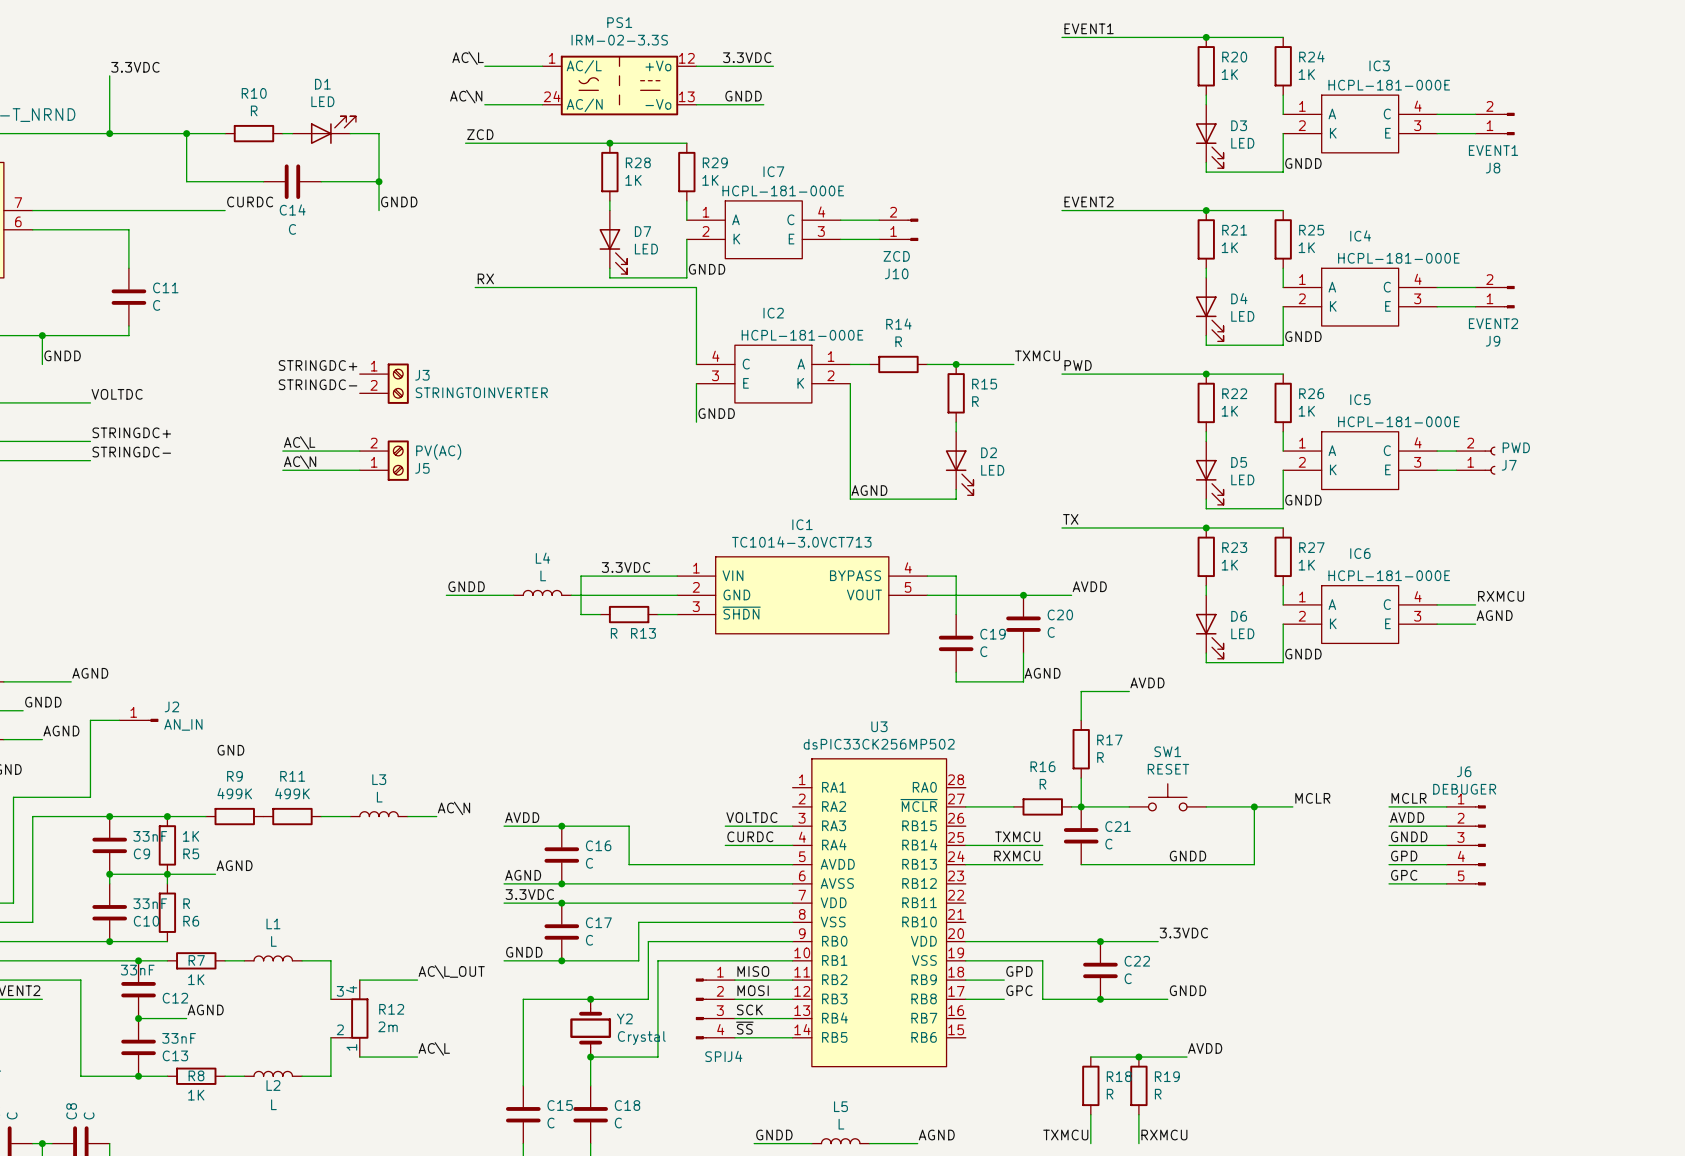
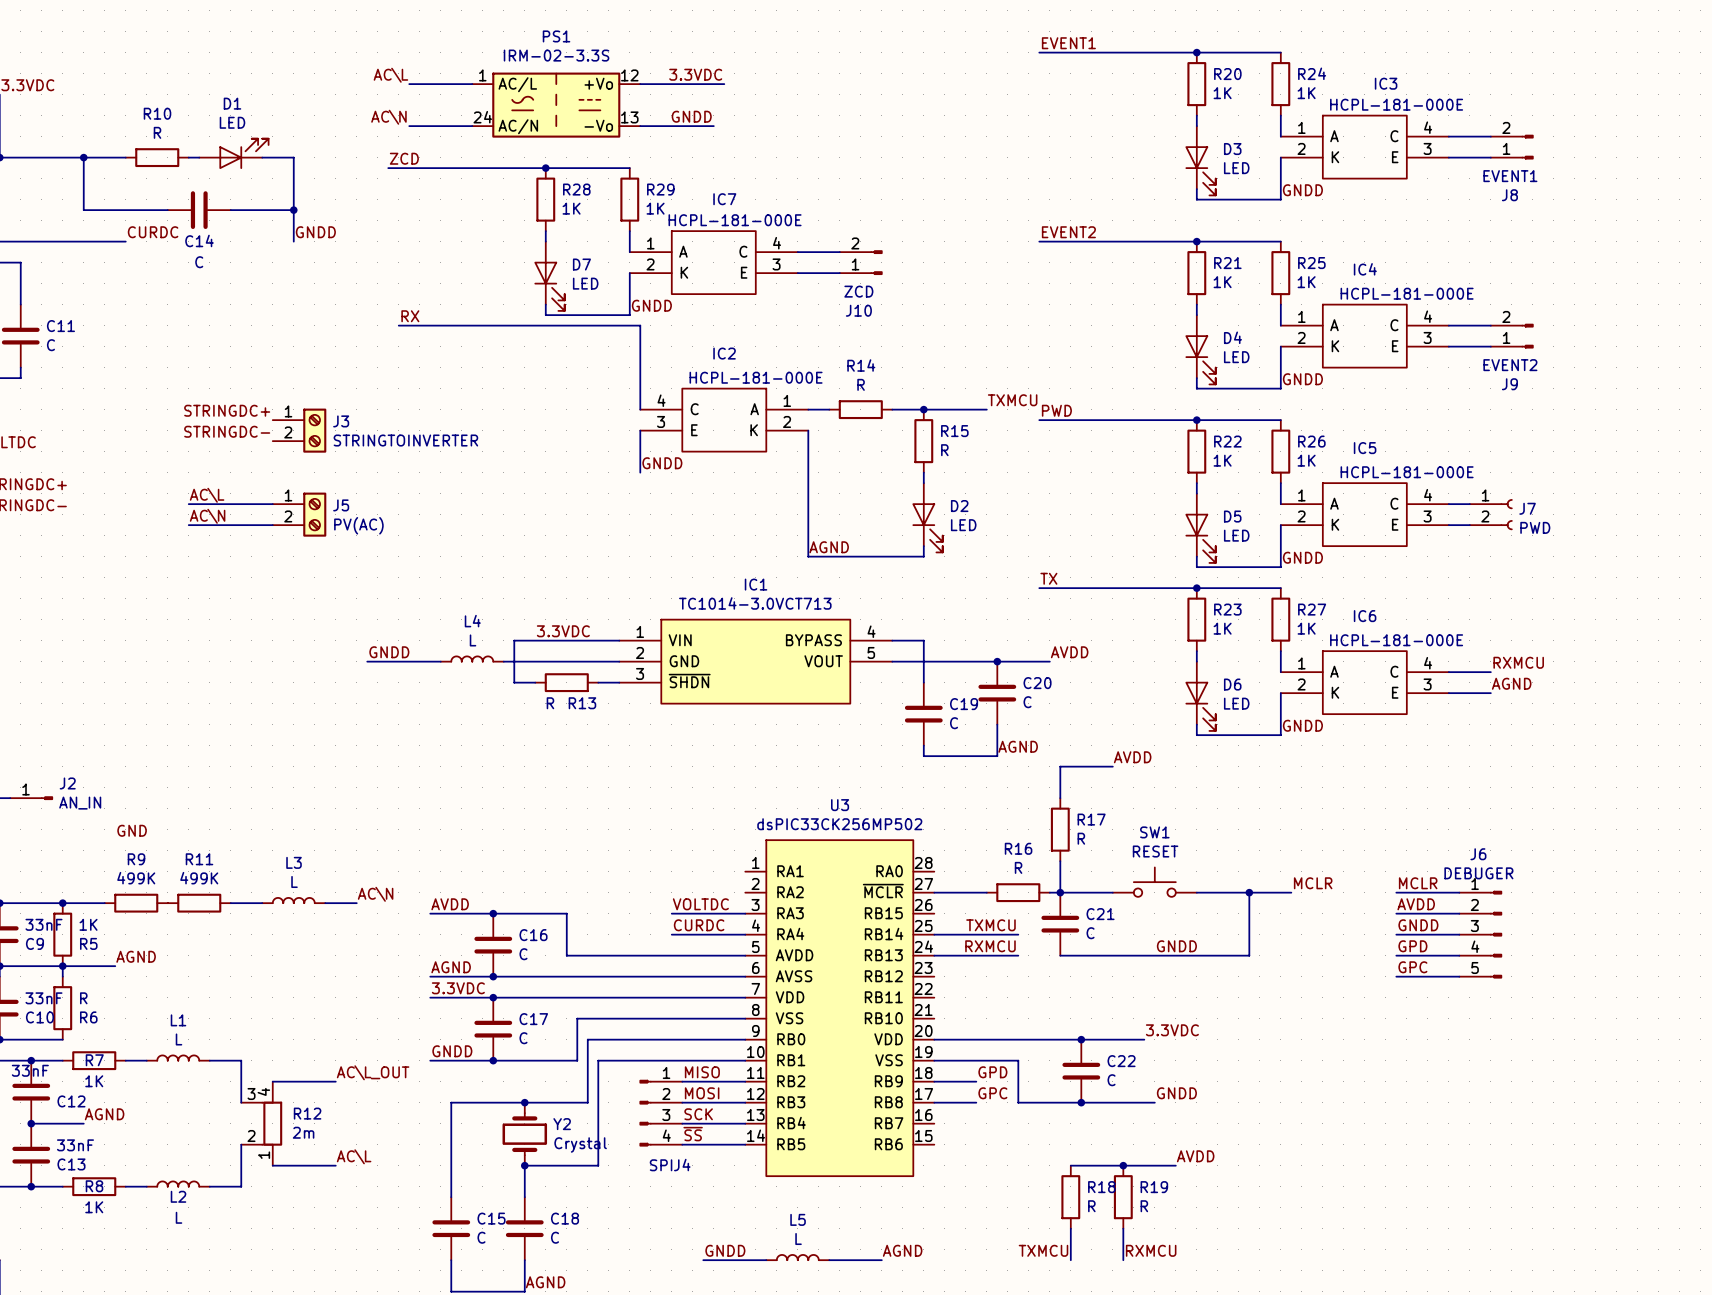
J5 flip: as is (398, 460) -> up-down (314, 514)
J7 flip: as is (1490, 460) -> up-down (1506, 514)

